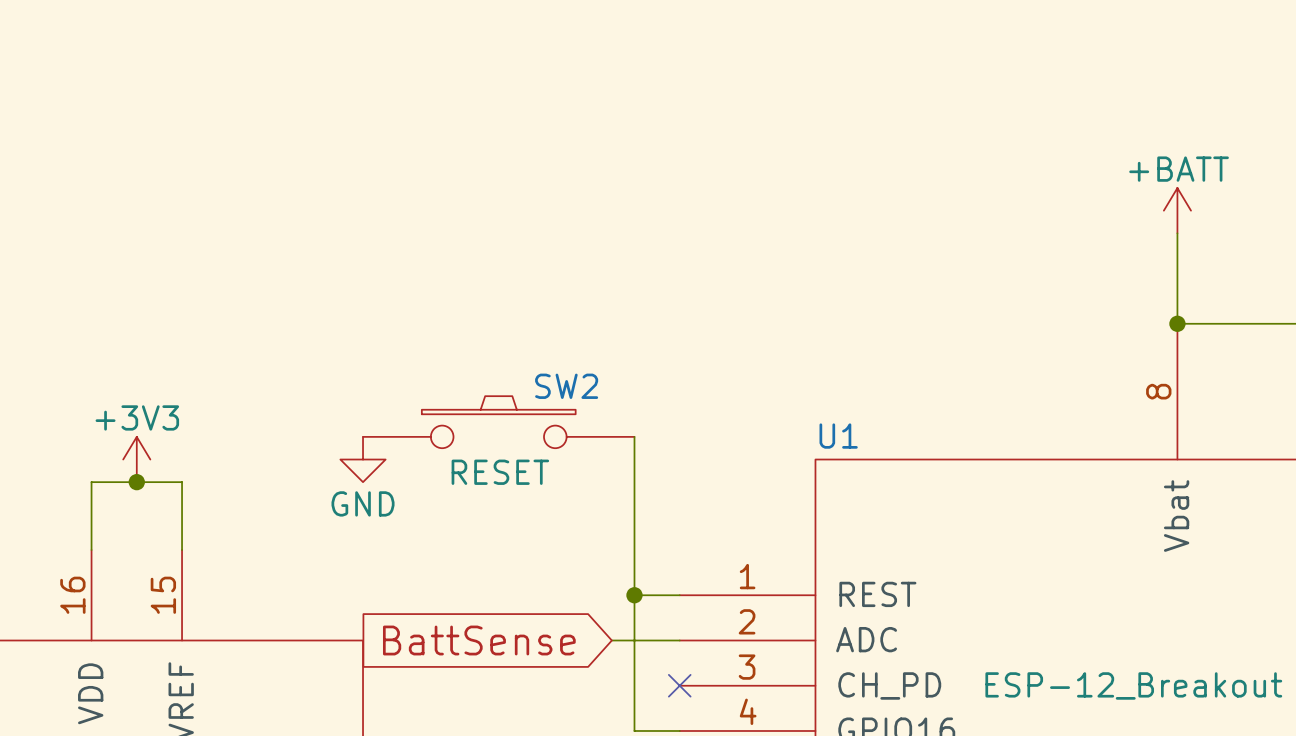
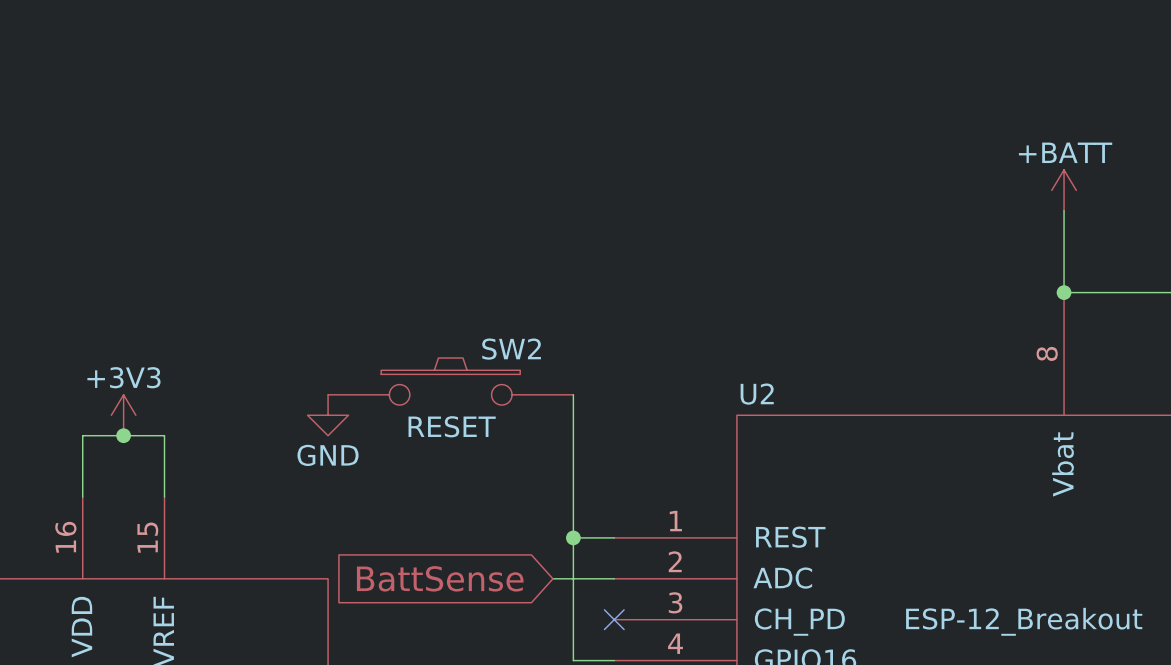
U1 name: U1 (838, 436) -> U2 (757, 394)

